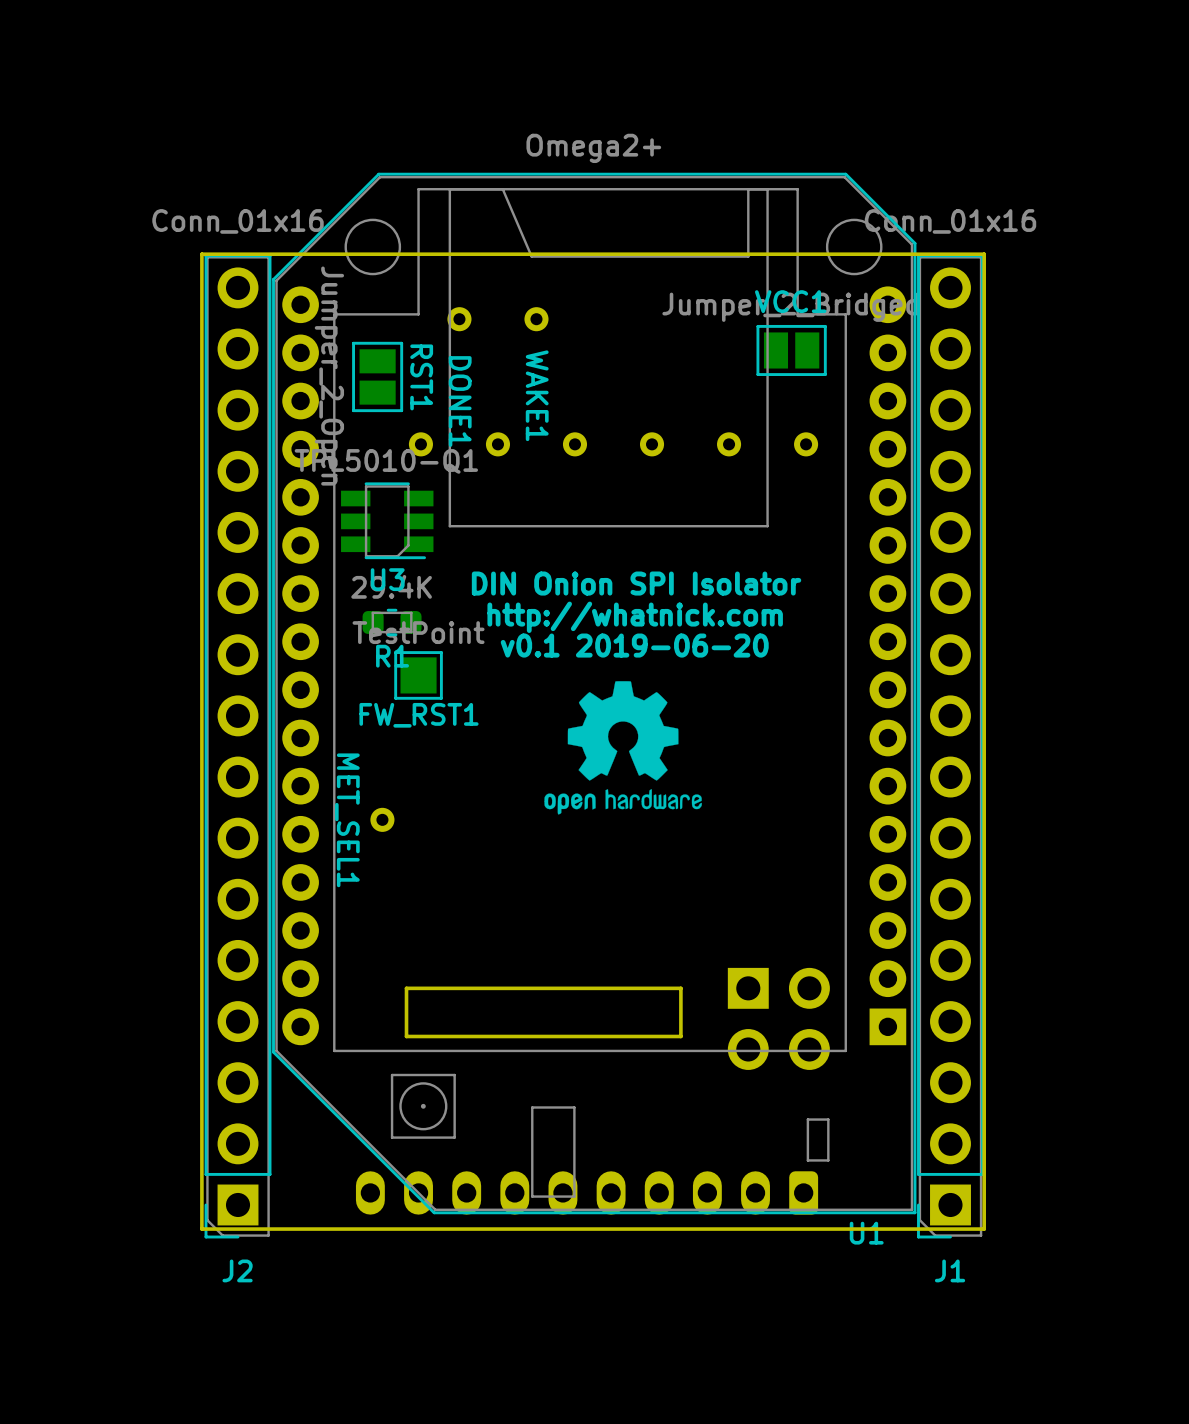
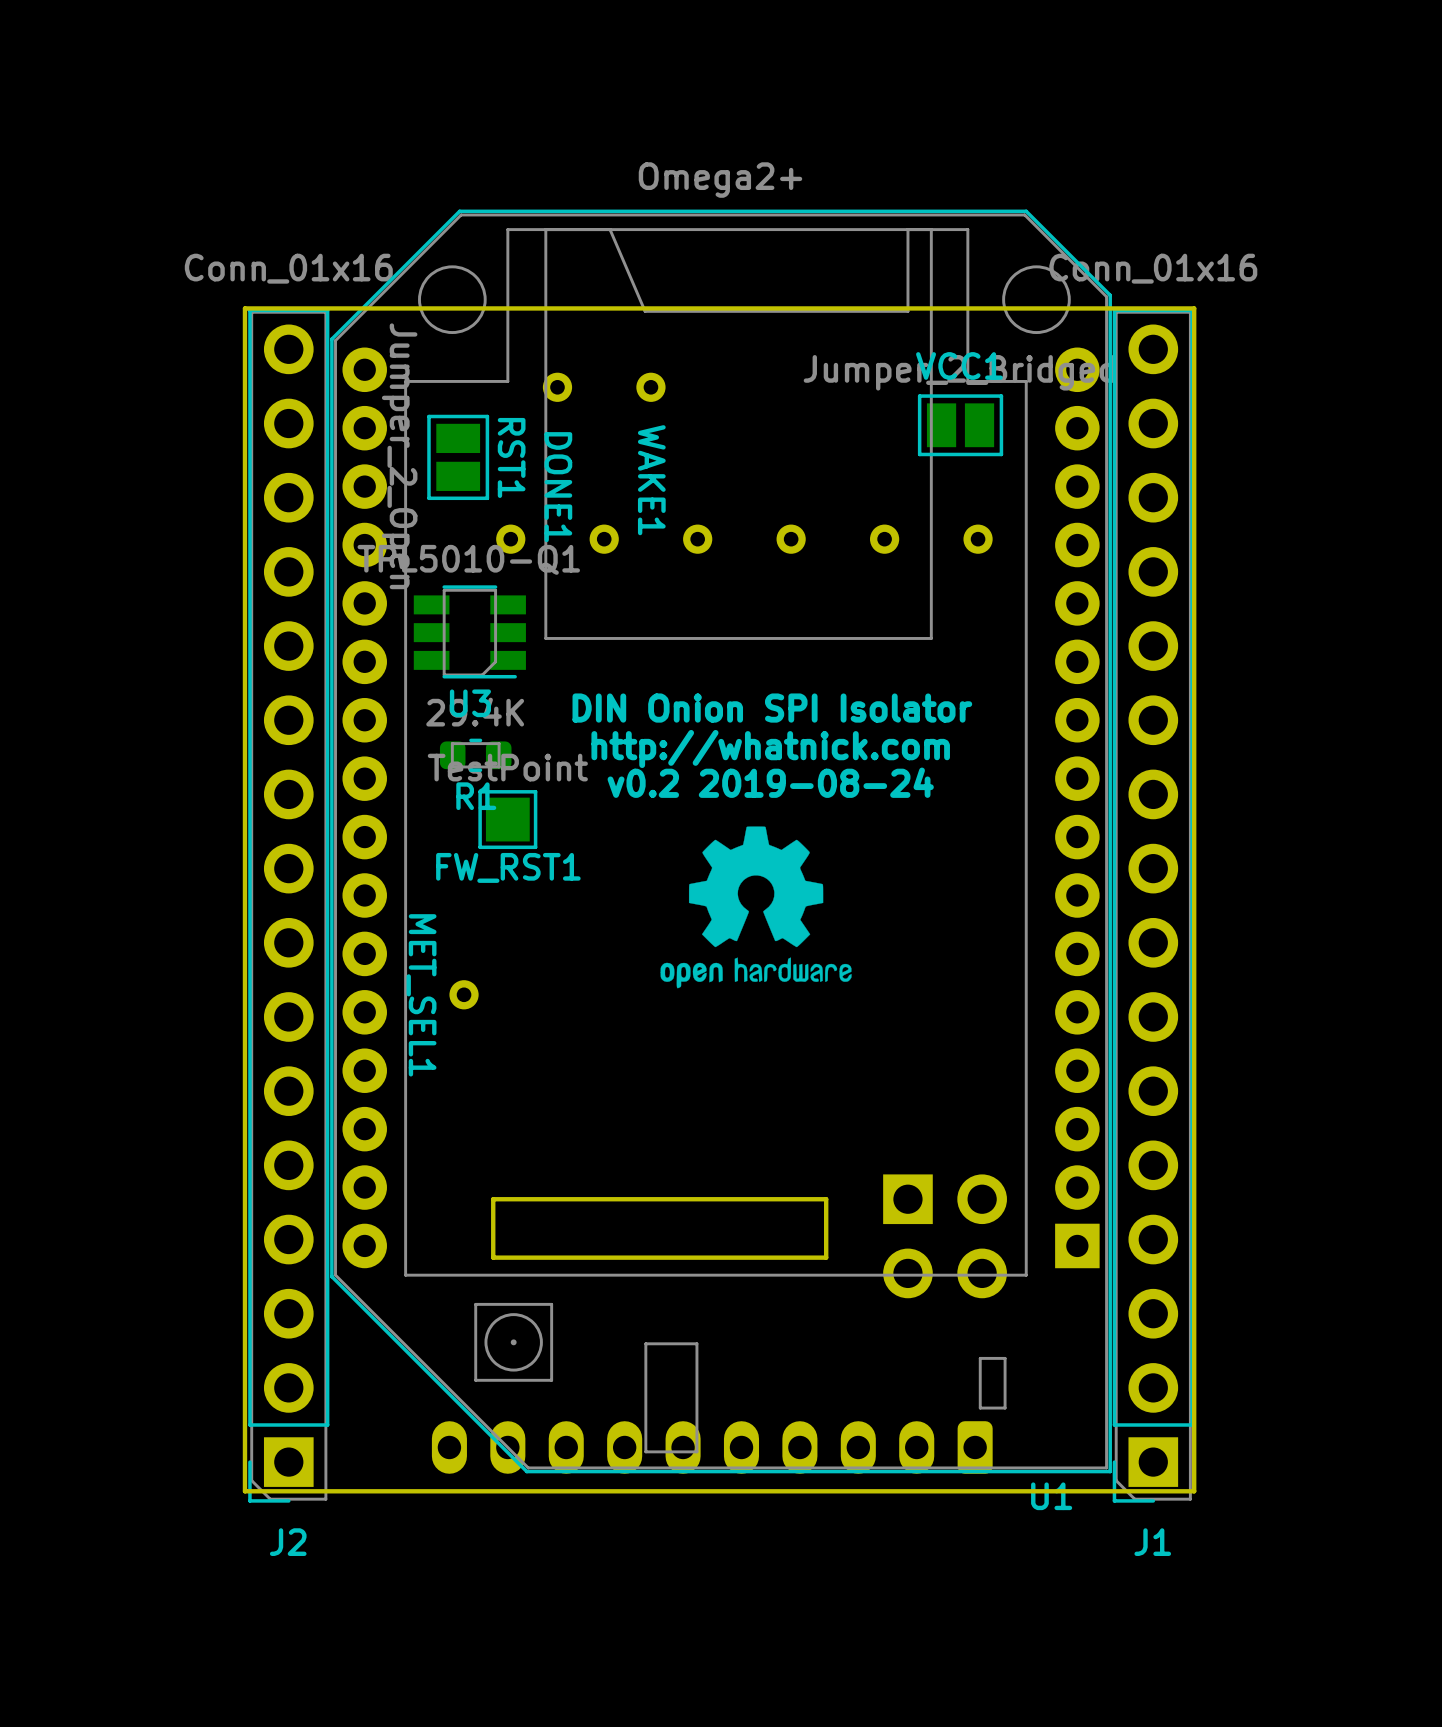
text: v0.1 2019-06-20 (634, 645) -> v0.2 2019-08-24 (770, 782)

